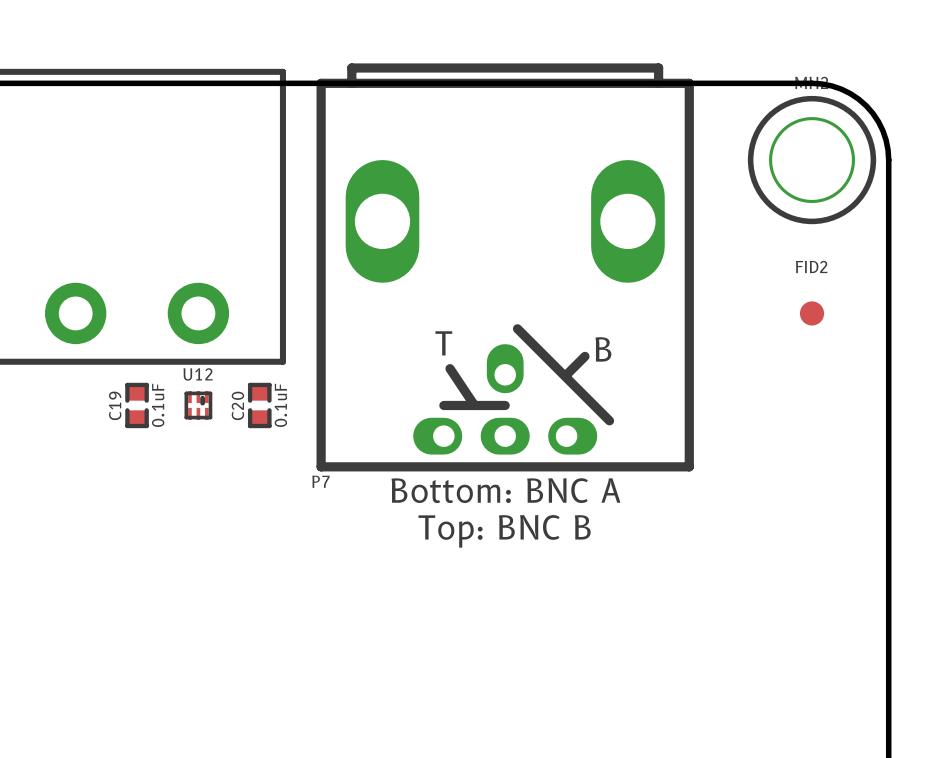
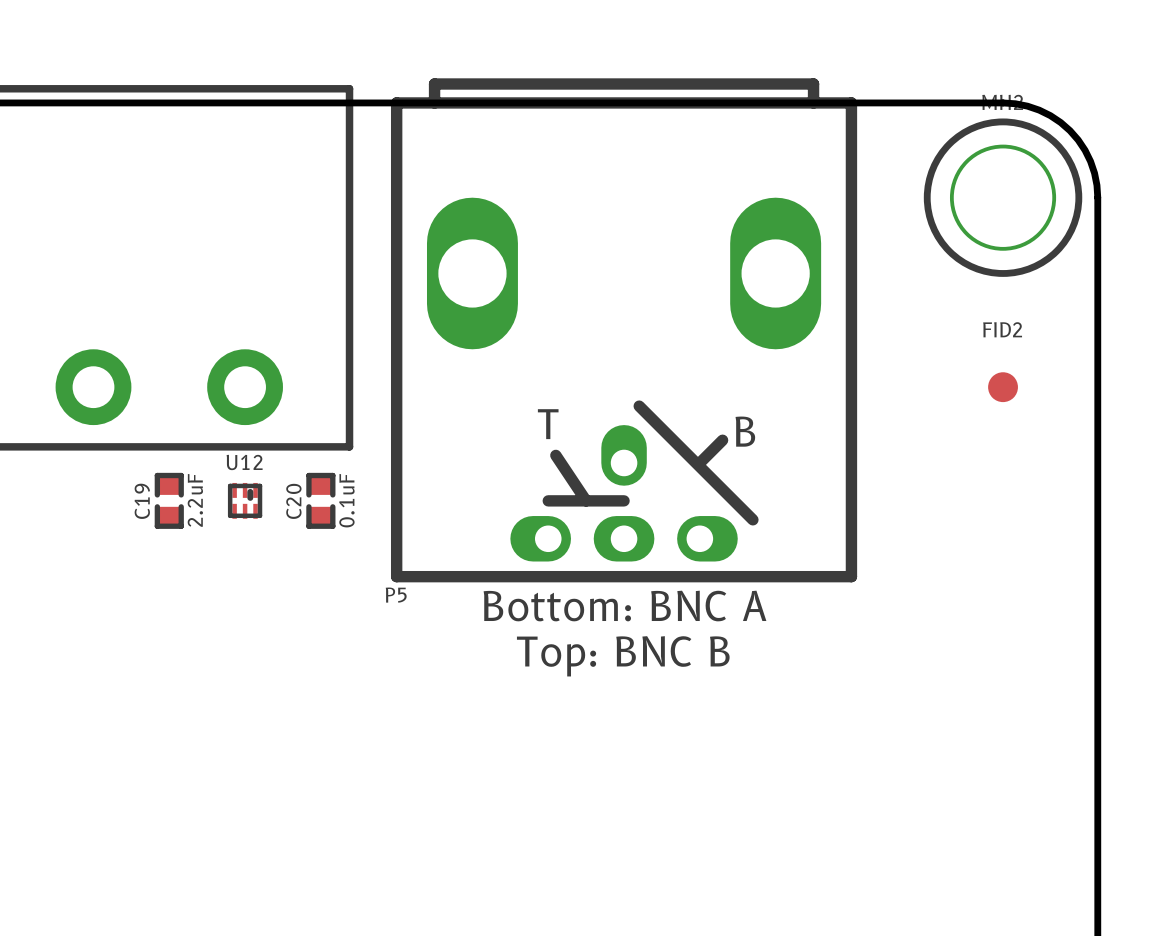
C19 value: 0.1uF (158, 405) -> 2.2uF (195, 500)
P7 name: P7 (320, 481) -> P5 (396, 595)

